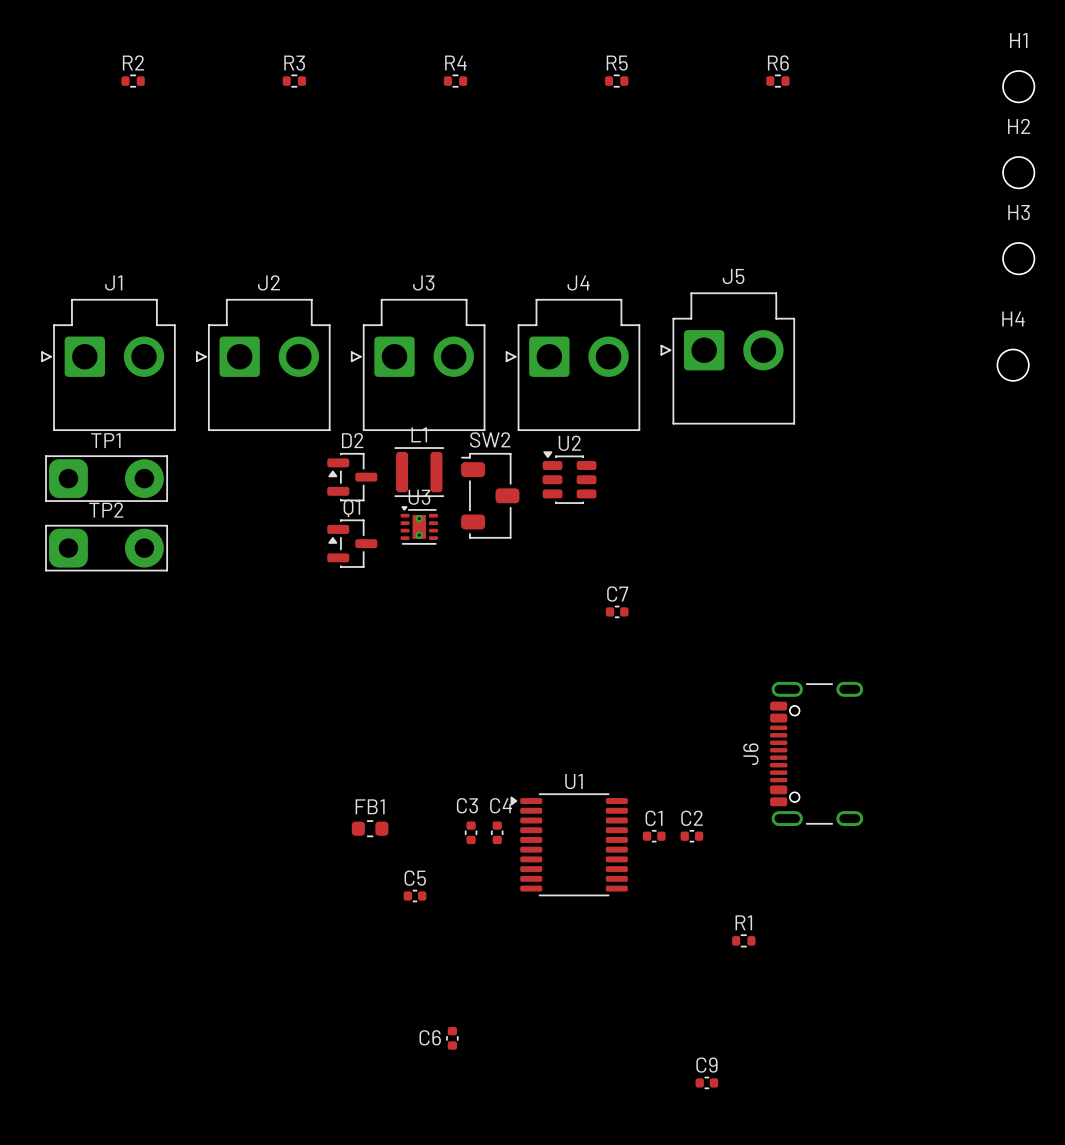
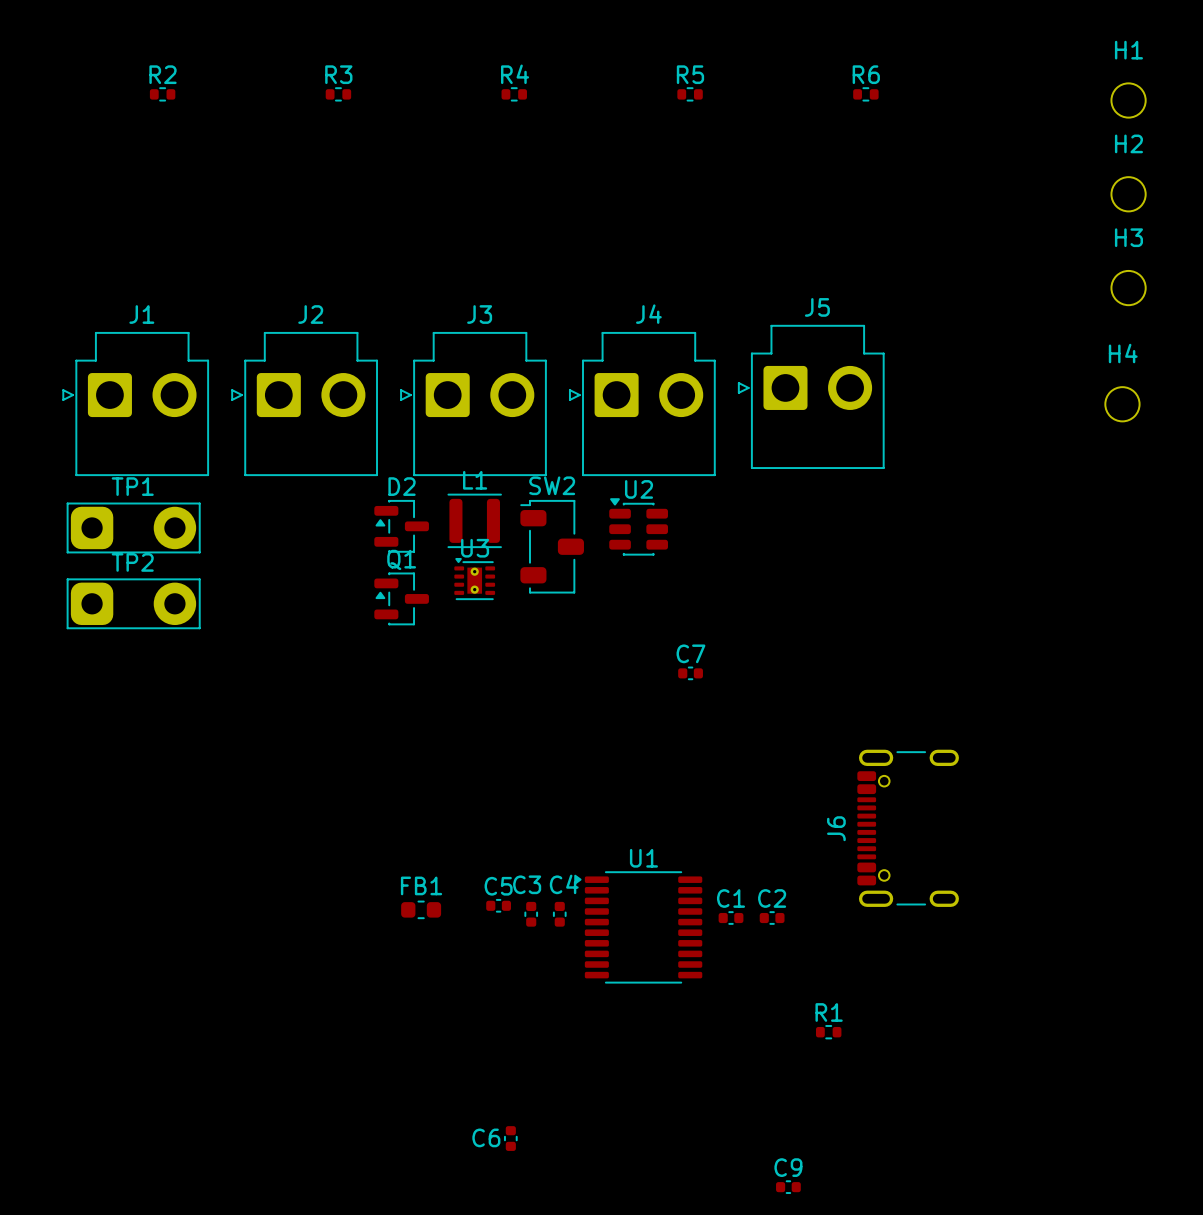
C5 position: (414, 896) -> (498, 905)

